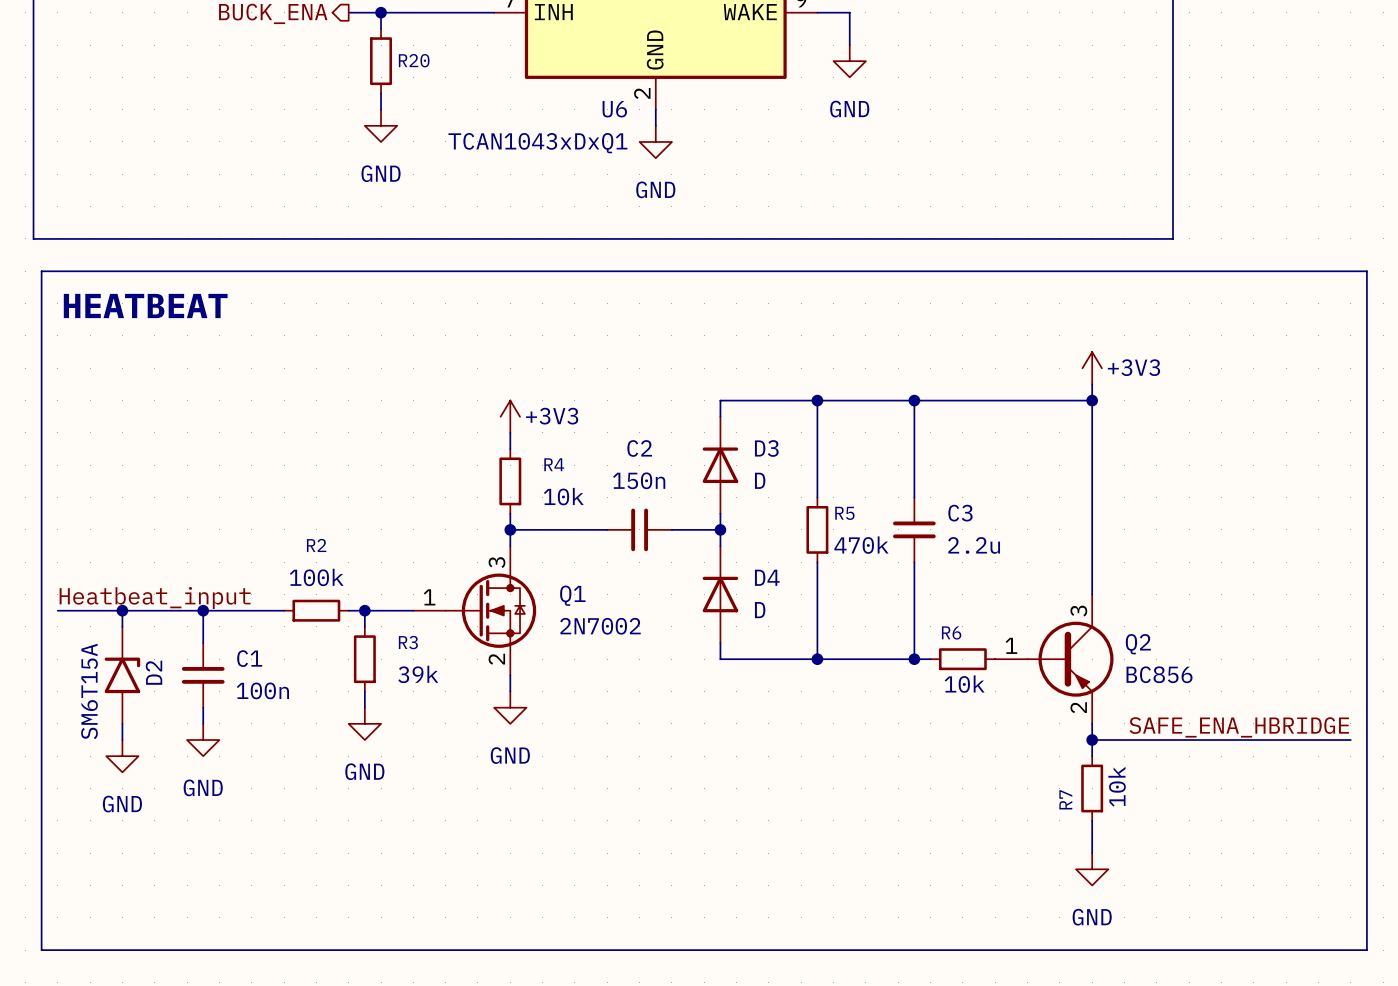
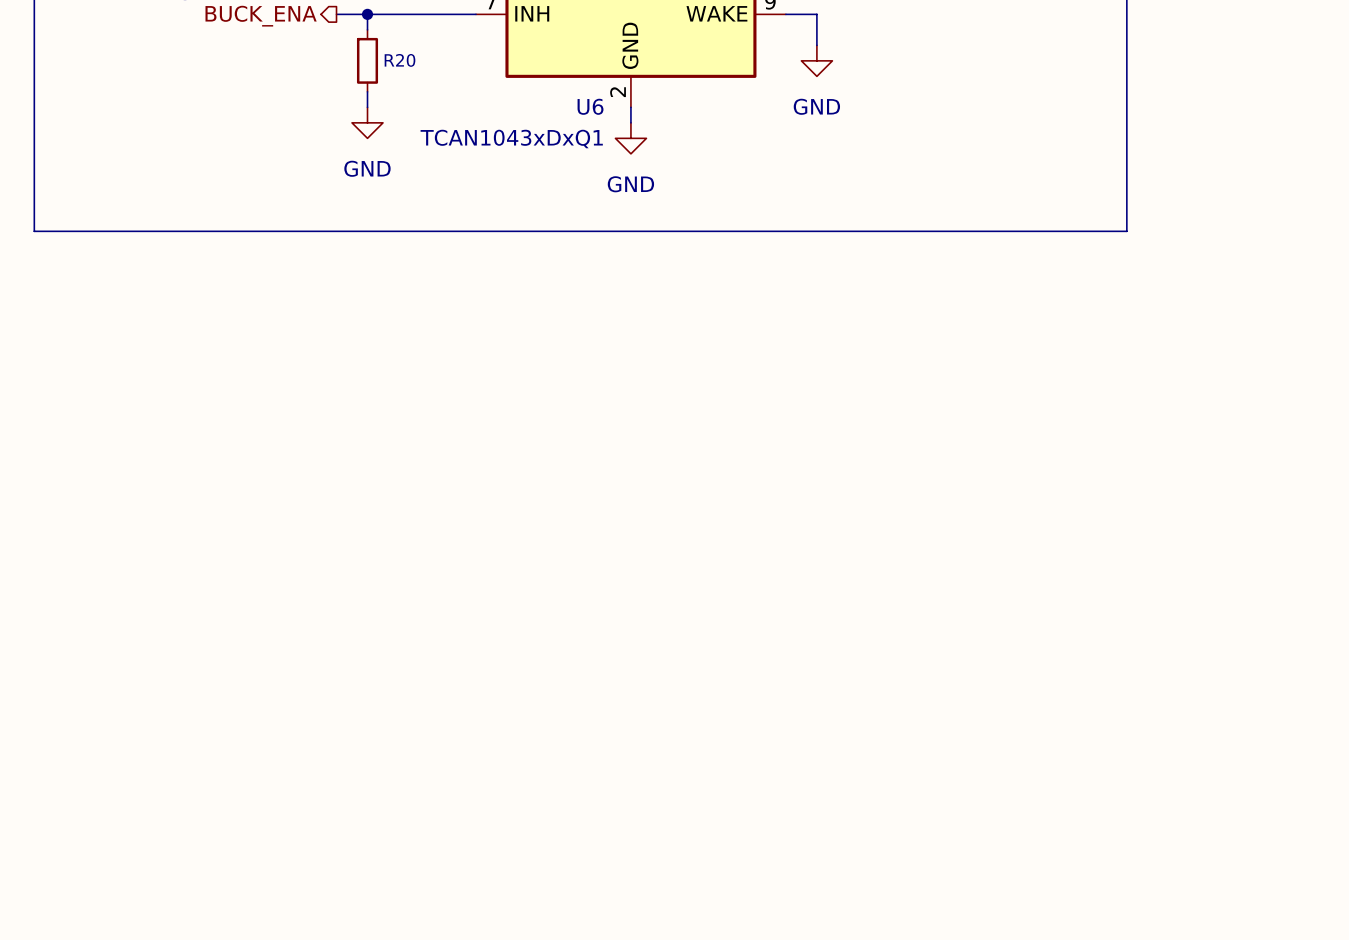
line: (41, 271) (1366, 271) (1366, 950) (41, 950) (41, 271) -> none
text: HEATBEAT (145, 305) -> none
power symbol: +3V3 (1092, 368) -> none
wire: (1092, 384) (1092, 594) -> none
wire: (817, 400) (817, 497) -> none
junction: (817, 400) -> none
wire: (914, 400) (914, 497) -> none
junction: (914, 400) -> none
wire: (1092, 400) (720, 400) (720, 416) -> none
junction: (1092, 400) -> none
power symbol: +3V3 (510, 416) -> none
wire: (510, 432) (510, 449) -> none
D3: D (720, 465) -> none
R4: 10k (510, 481) -> none
wire: (510, 513) (510, 546) -> none
wire: (720, 513) (720, 546) -> none
wire: (510, 529) (607, 529) -> none
junction: (510, 529) -> none
C2: 150n (639, 529) -> none
wire: (671, 529) (720, 529) -> none
junction: (720, 529) -> none
R5: 470k (817, 529) -> none
C3: 2.2u (914, 529) -> none
wire: (817, 562) (817, 659) -> none
wire: (914, 562) (914, 659) -> none
D4: D (720, 594) -> none
label: Heatbeat_input (155, 598) -> none
wire: (57, 610) (284, 610) -> none
wire: (122, 610) (122, 626) -> none
junction: (122, 610) -> none
wire: (203, 610) (203, 643) -> none
junction: (203, 610) -> none
R2: 100k (316, 610) -> none
wire: (348, 610) (413, 610) -> none
wire: (364, 610) (364, 626) -> none
junction: (364, 610) -> none
Q1: 2N7002 (474, 610) -> none
wire: (720, 643) (720, 659) (930, 659) -> none
R3: 39k (364, 659) -> none
junction: (817, 659) -> none
junction: (914, 659) -> none
R6: 10k (962, 659) -> none
Q2: BC856 (1054, 659) -> none
D2: SM6T15A (122, 675) -> none
C1: 100n (203, 675) -> none
wire: (510, 675) (510, 691) -> none
wire: (364, 691) (364, 707) -> none
wire: (203, 707) (203, 723) -> none
power symbol: GND (510, 707) -> none
wire: (122, 723) (122, 740) -> none
power symbol: GND (364, 723) -> none
wire: (1092, 723) (1092, 756) -> none
label: SAFE_ENA_HBRIDGE (1239, 727) -> none
power symbol: GND (203, 740) -> none
wire: (1092, 740) (1350, 740) -> none
junction: (1092, 740) -> none
power symbol: GND (122, 756) -> none
R7: 10k (1092, 788) -> none
wire: (1092, 820) (1092, 853) -> none
power symbol: GND (1092, 869) -> none

